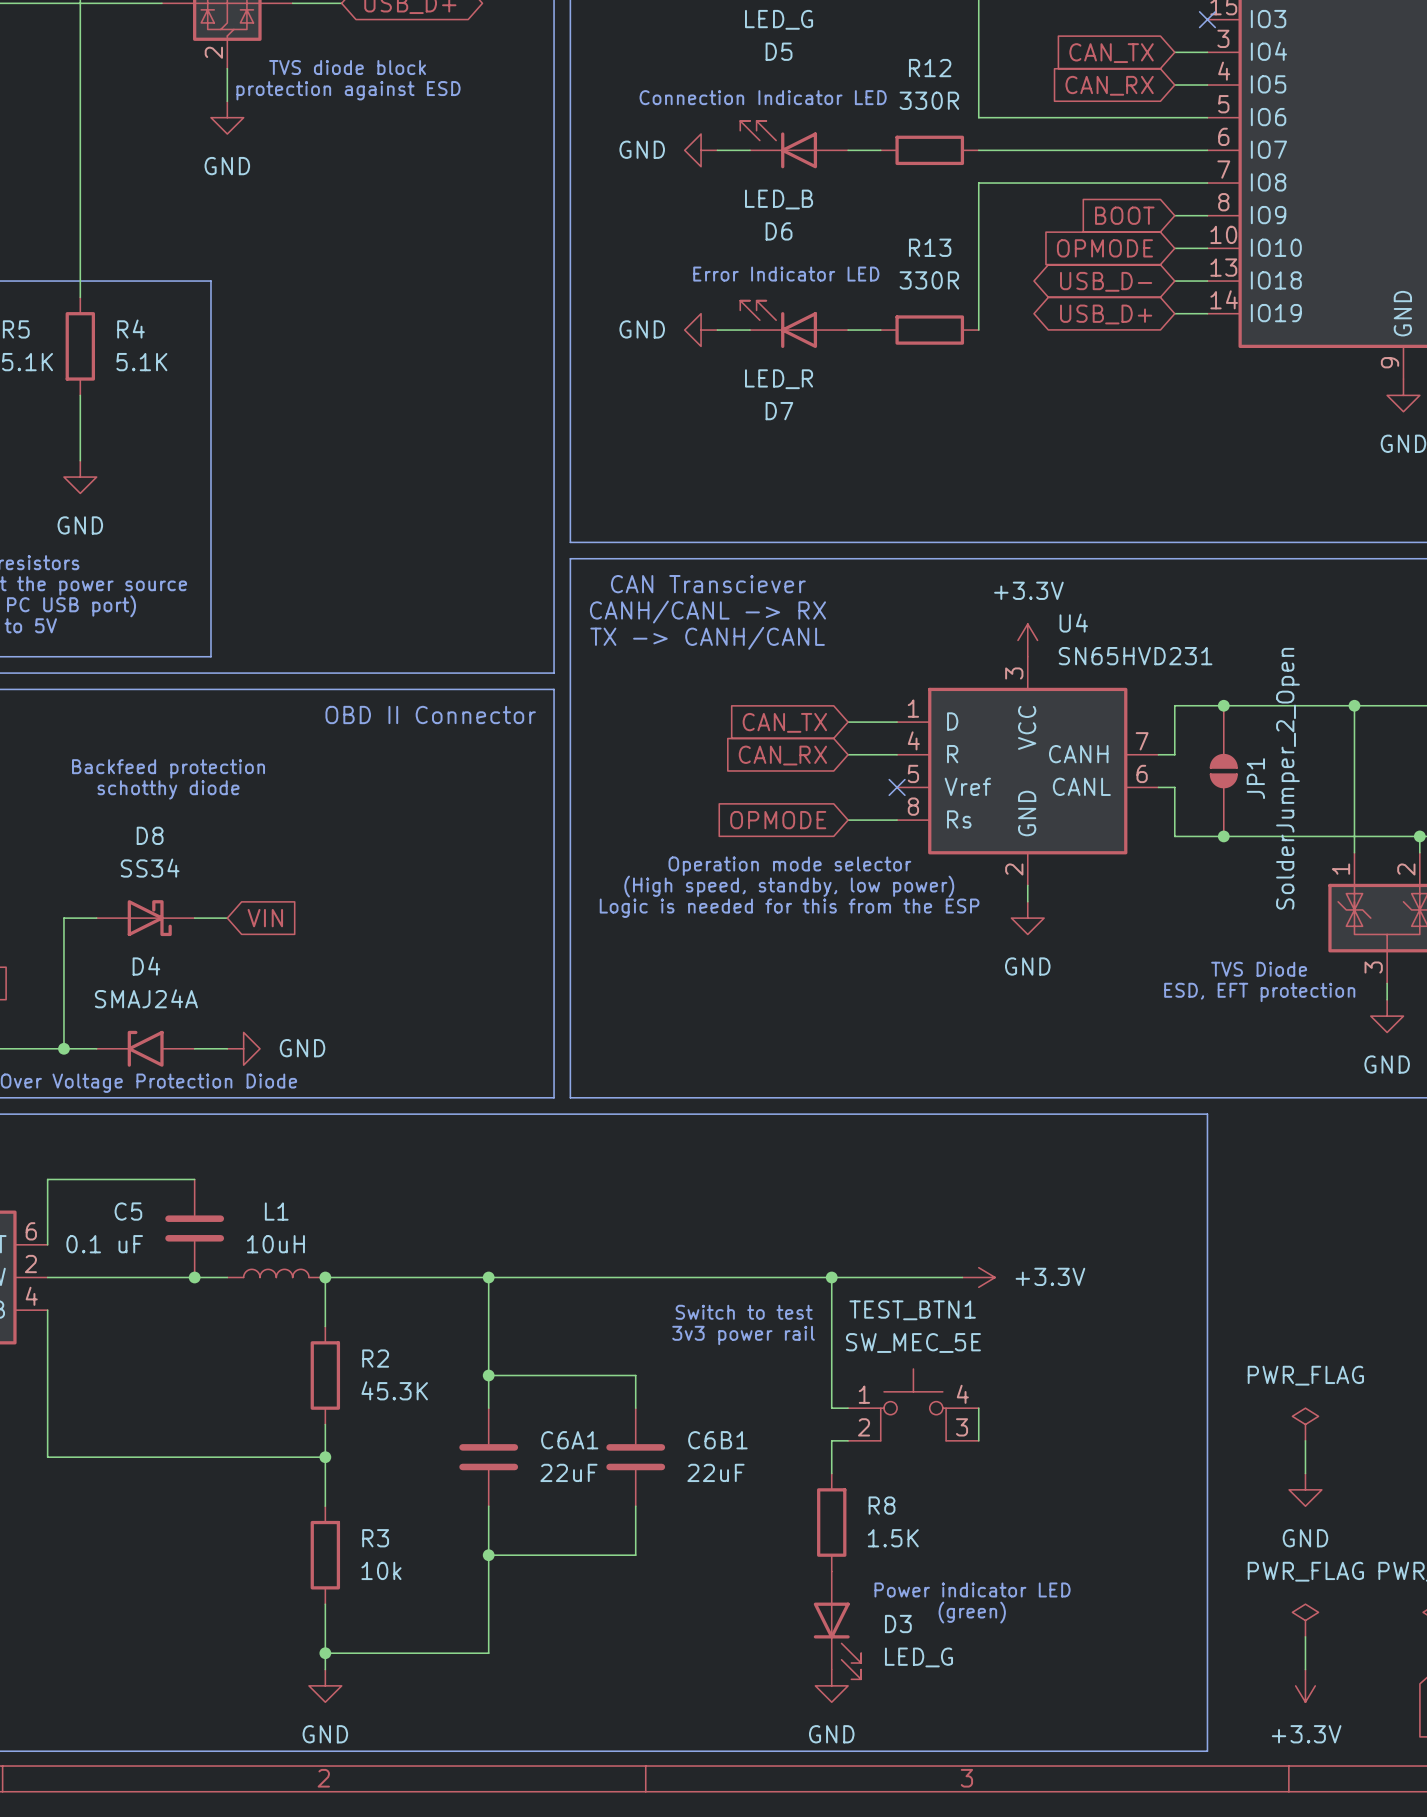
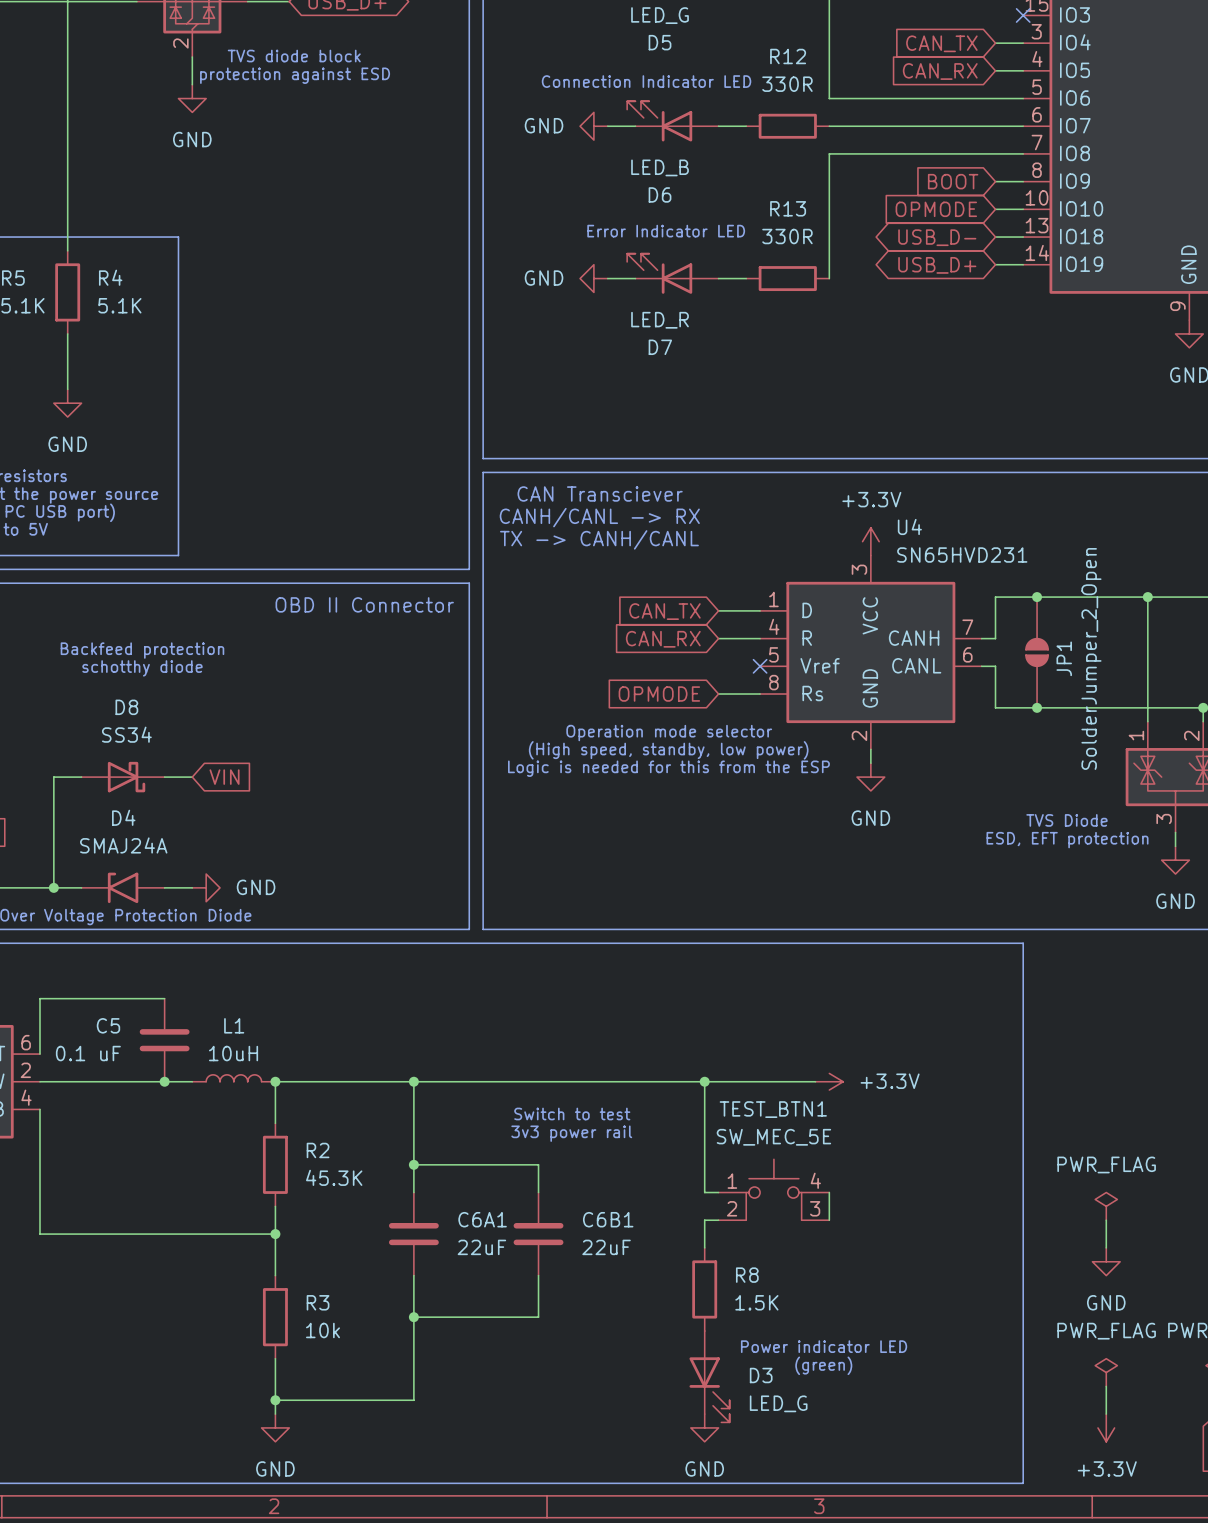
text position: Switch to test (744, 1312) -> Switch to test (572, 1114)
text position: 3v3 power rail (743, 1335) -> 3v3 power rail (571, 1133)

